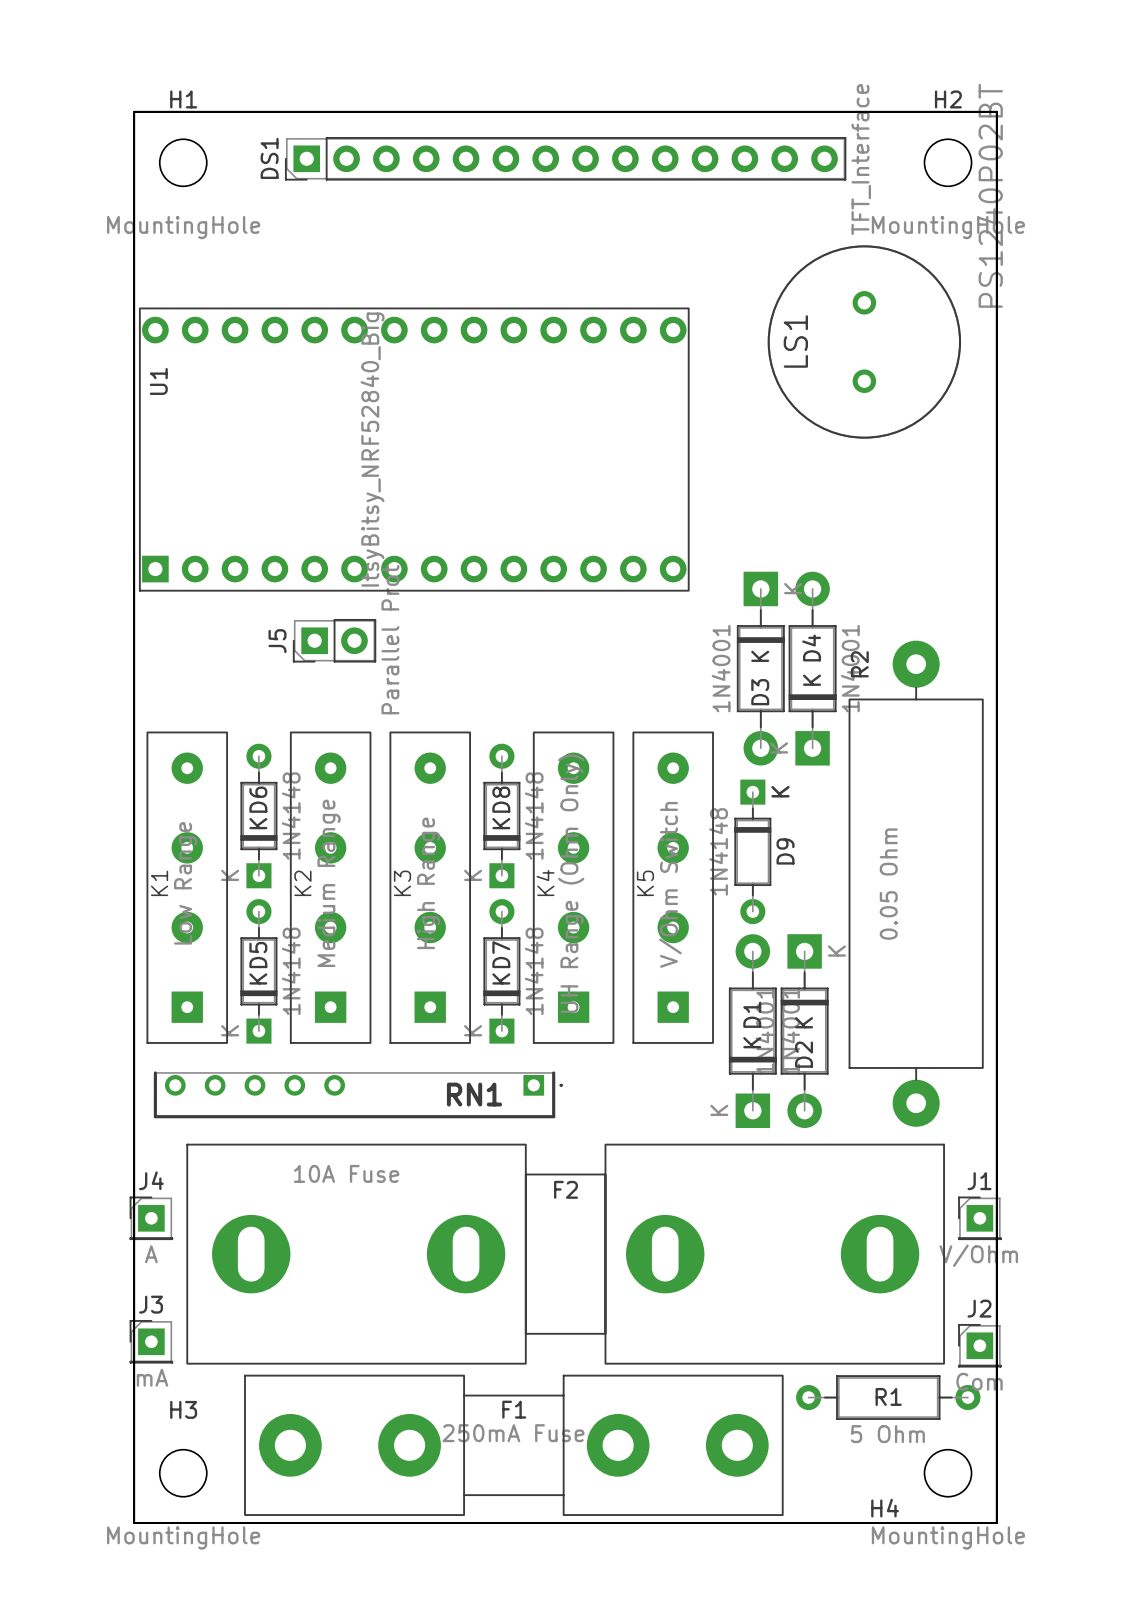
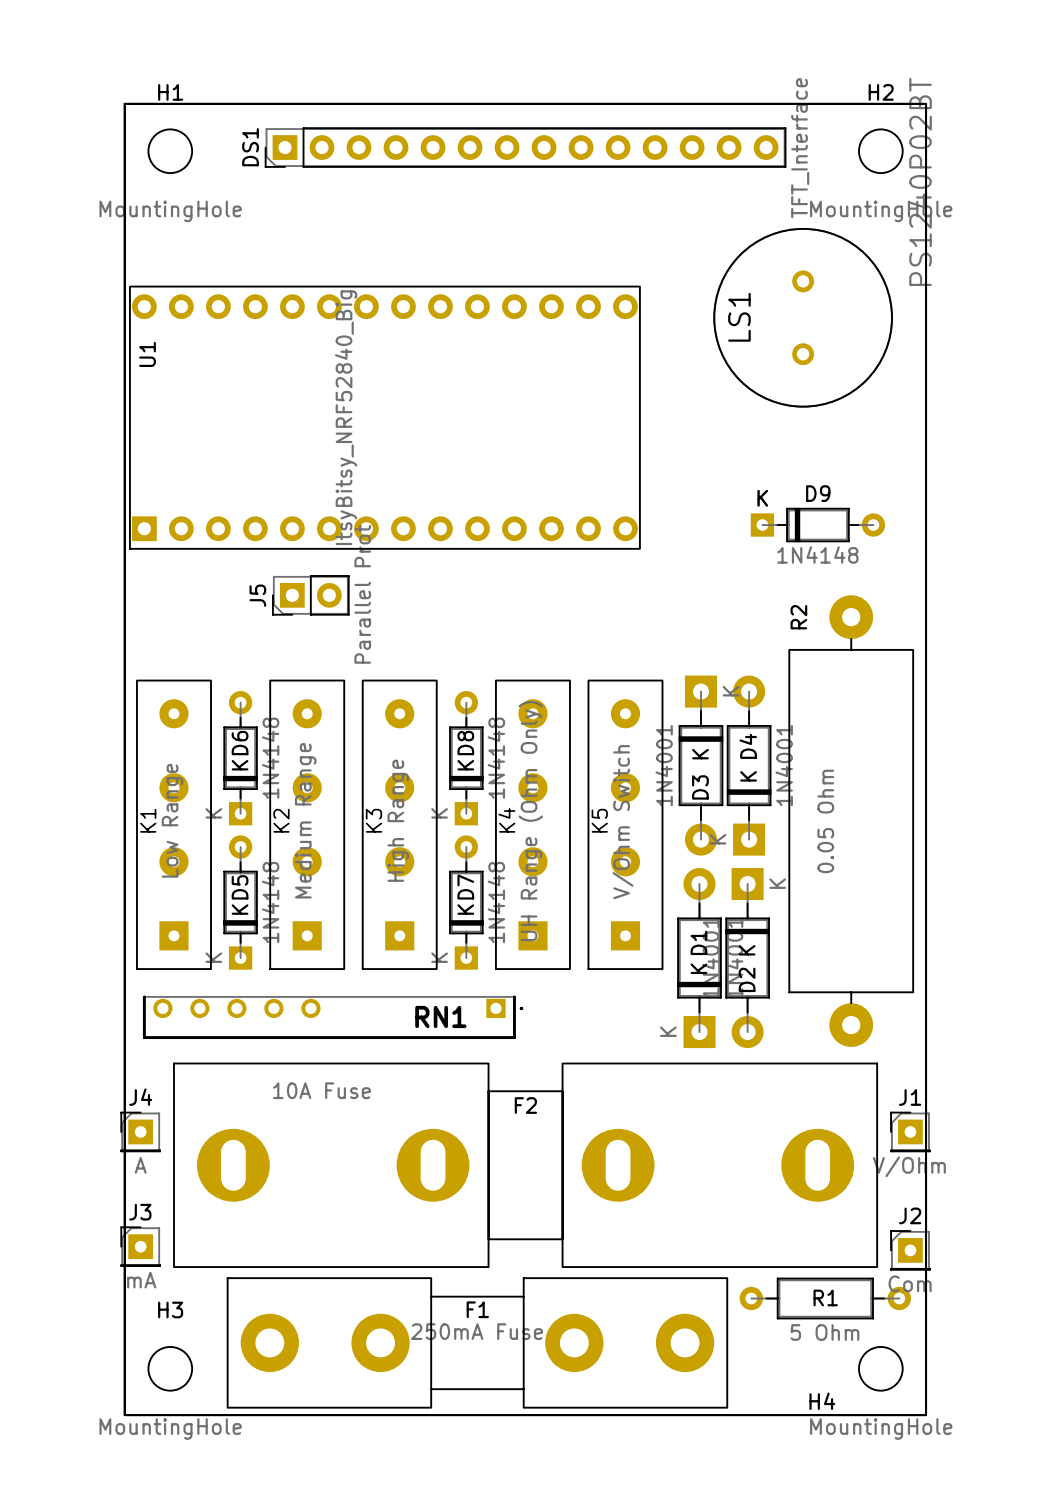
D3 position: (760, 668) -> (700, 765)
D4 position: (812, 668) -> (749, 765)
D9 rotation: 0° (752, 851) -> 90° counterclockwise (817, 525)
D9 position: (752, 851) -> (817, 525)

